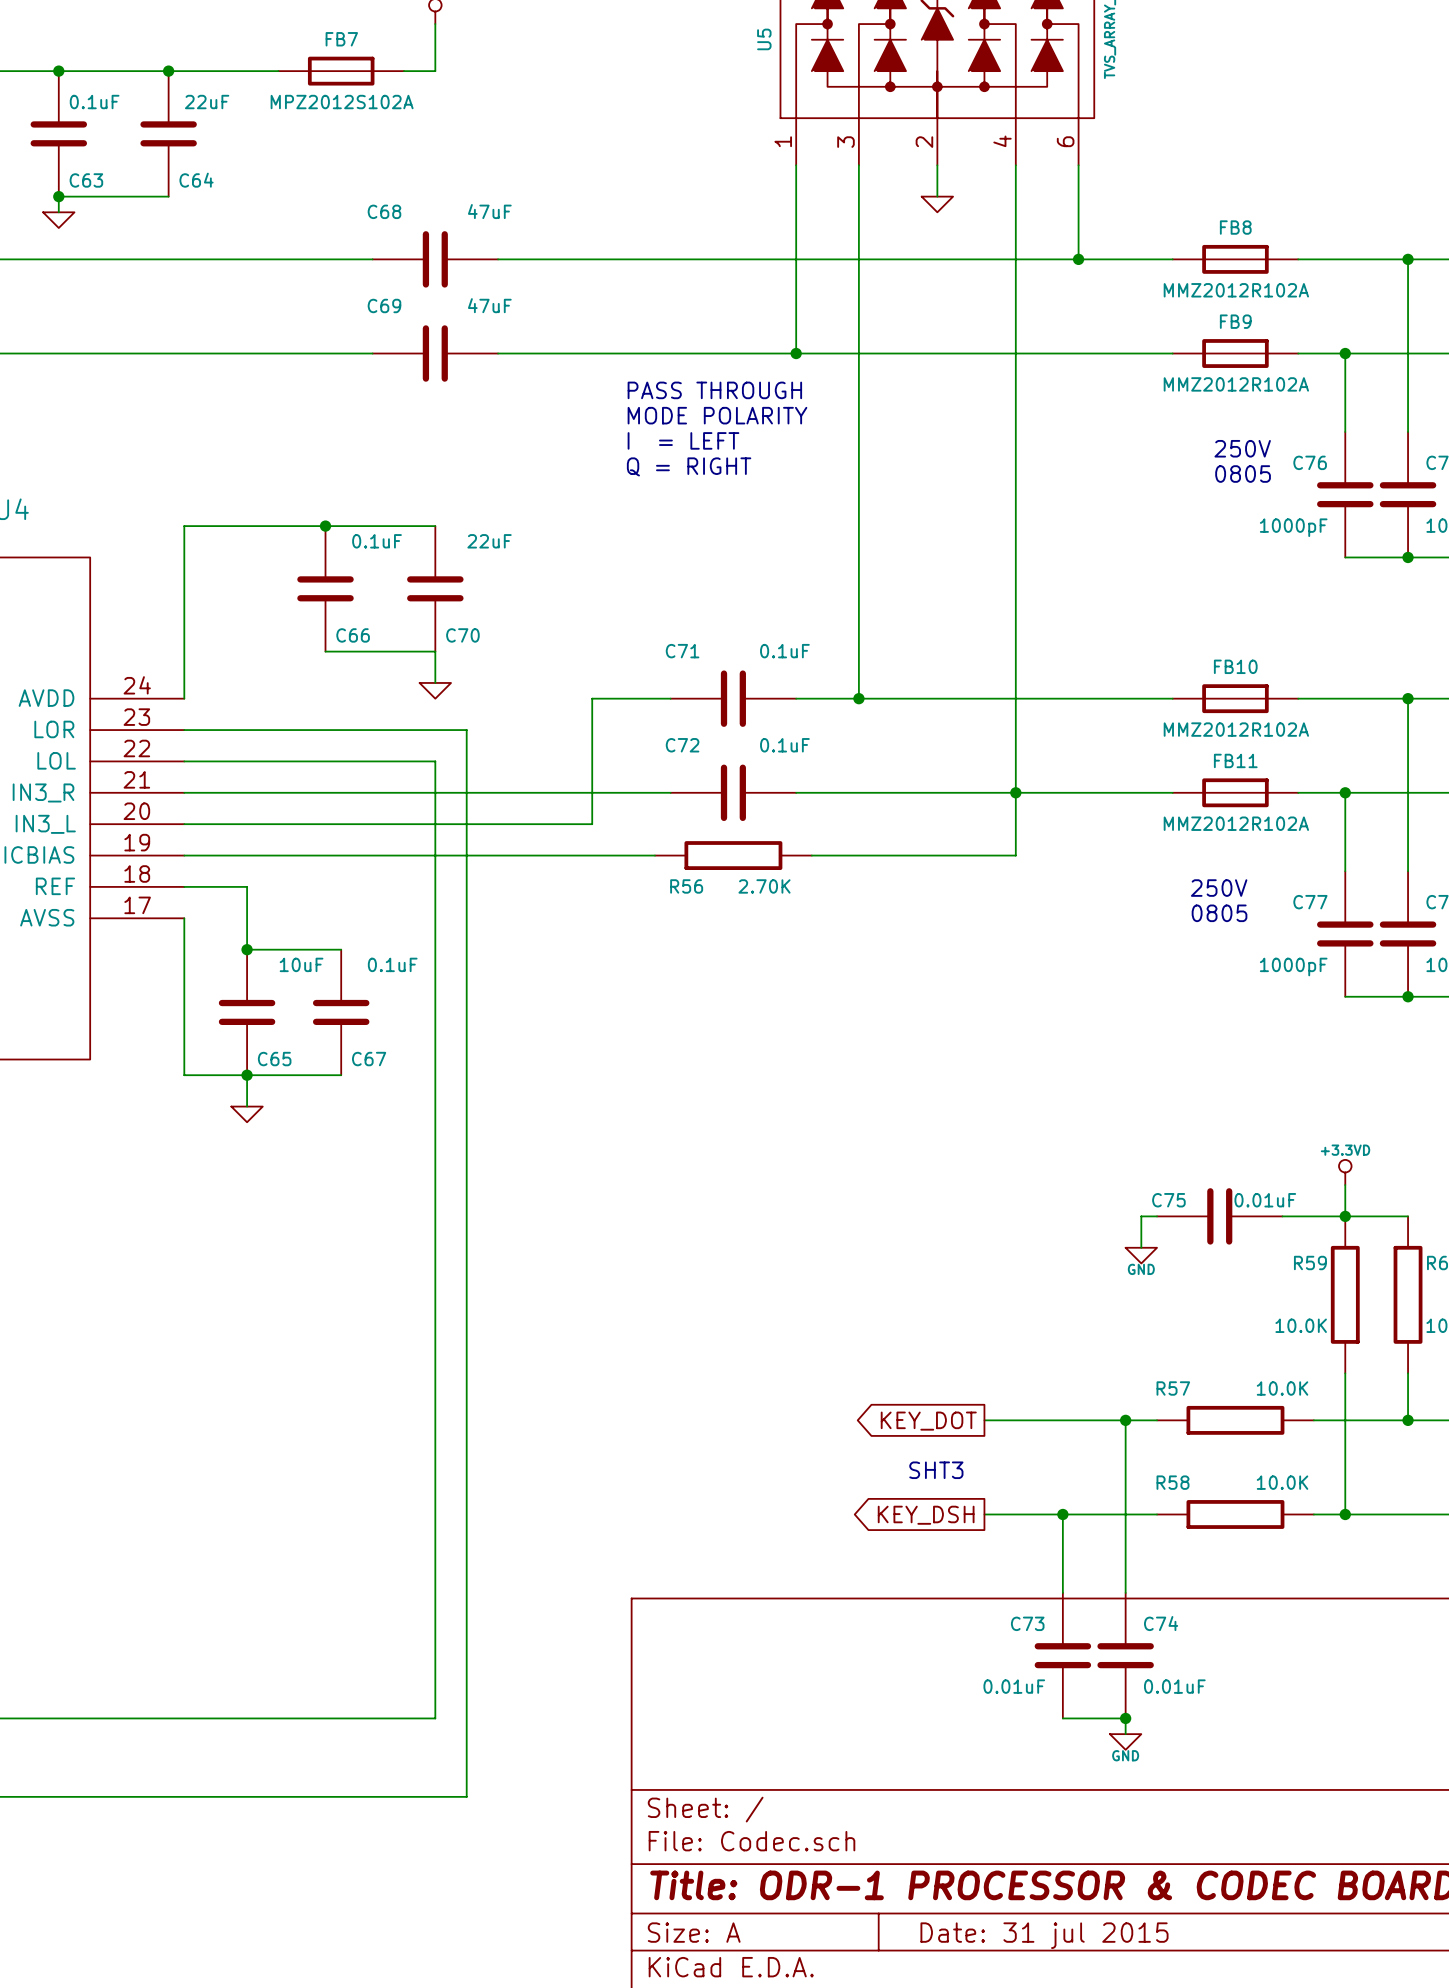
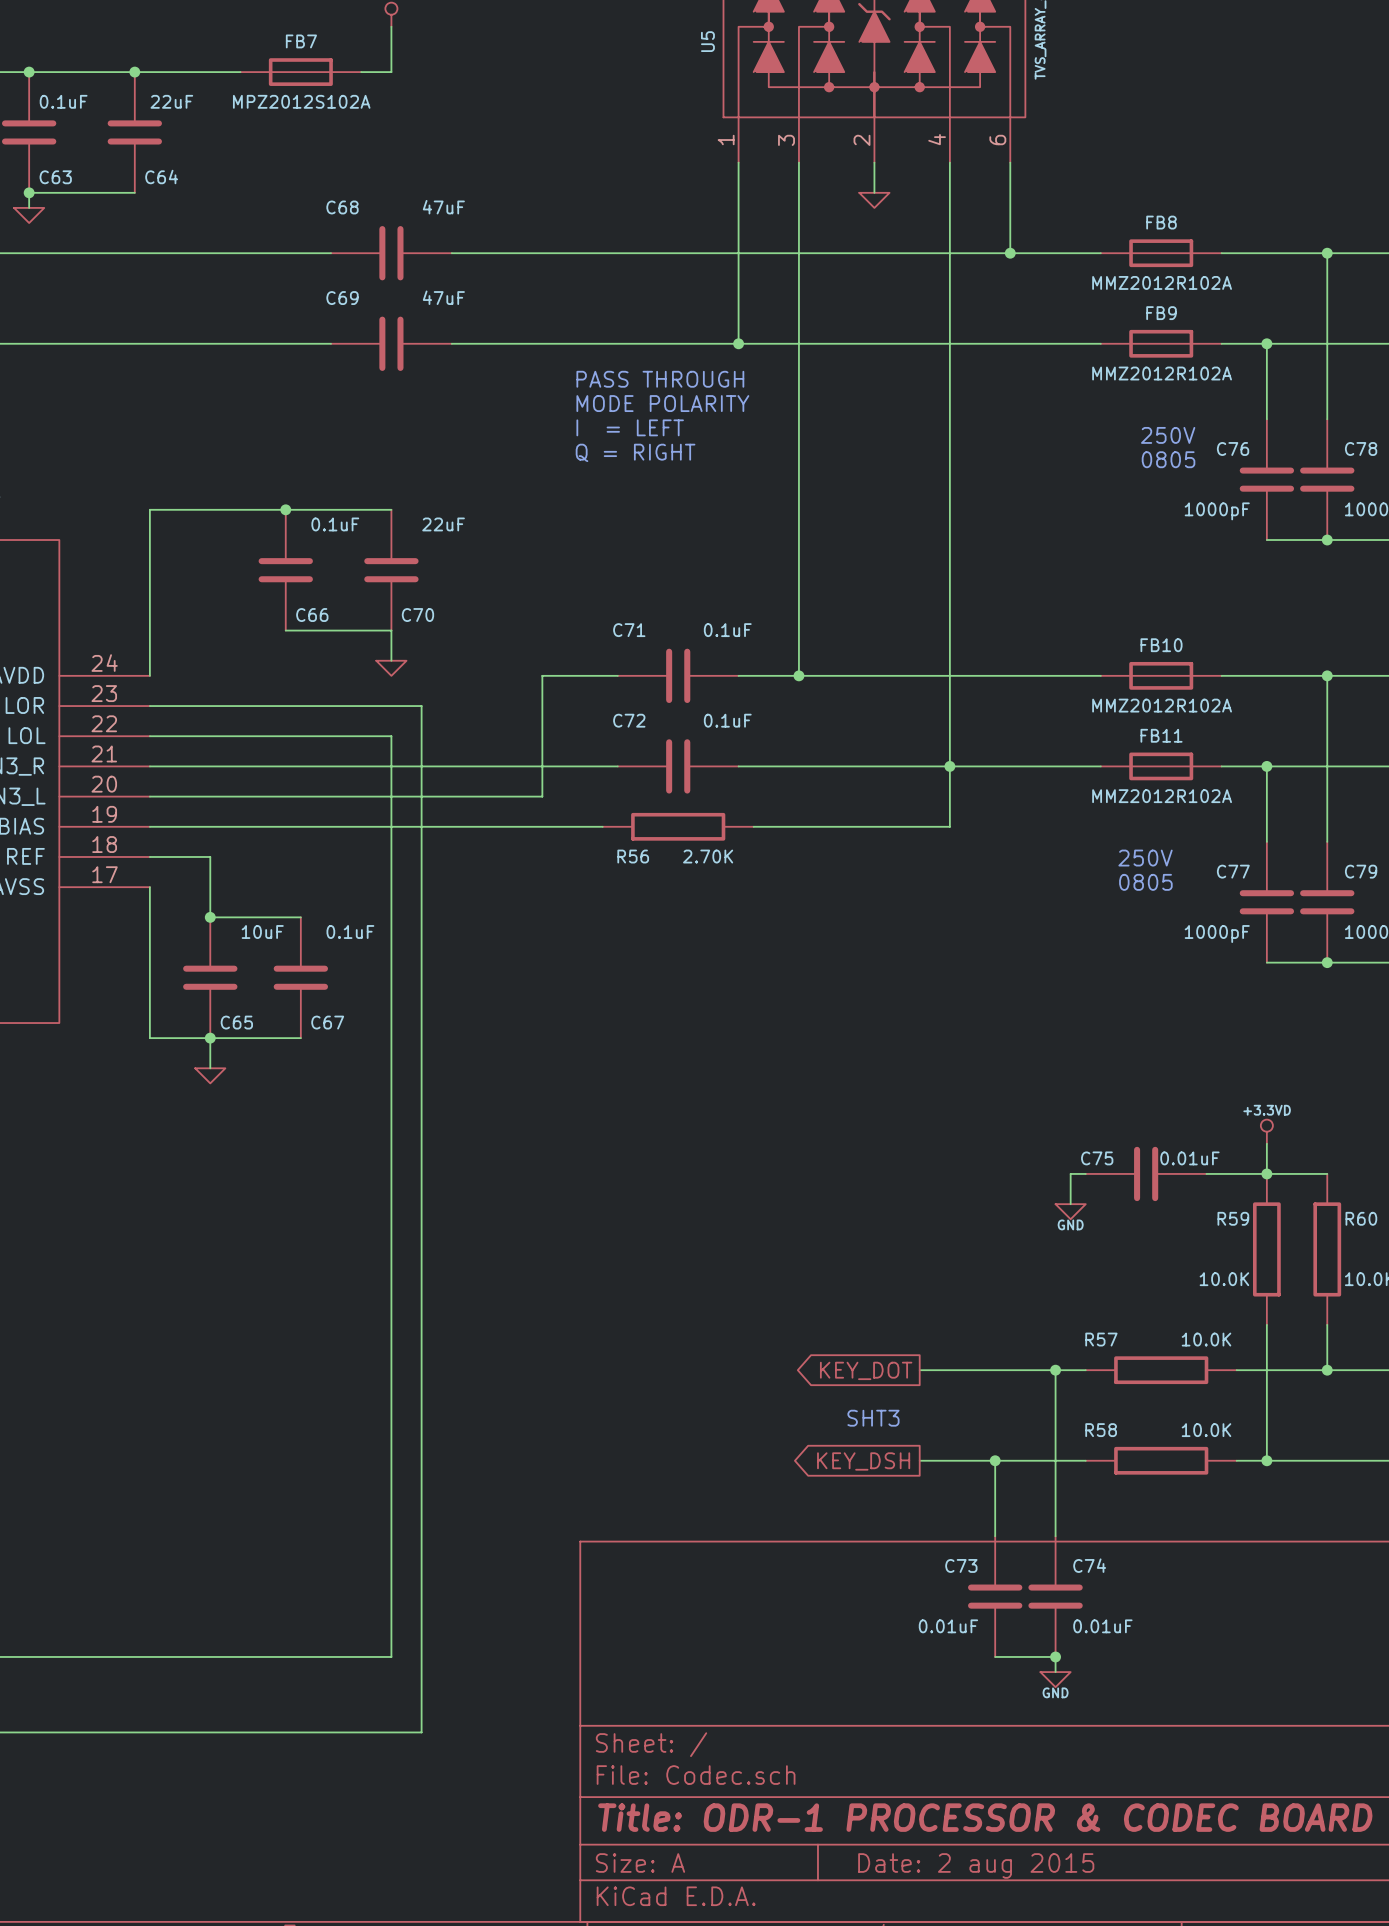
title block: Date: 31 jul 2015 (1044, 1935) -> Date: 2 aug 2015 (976, 1865)

